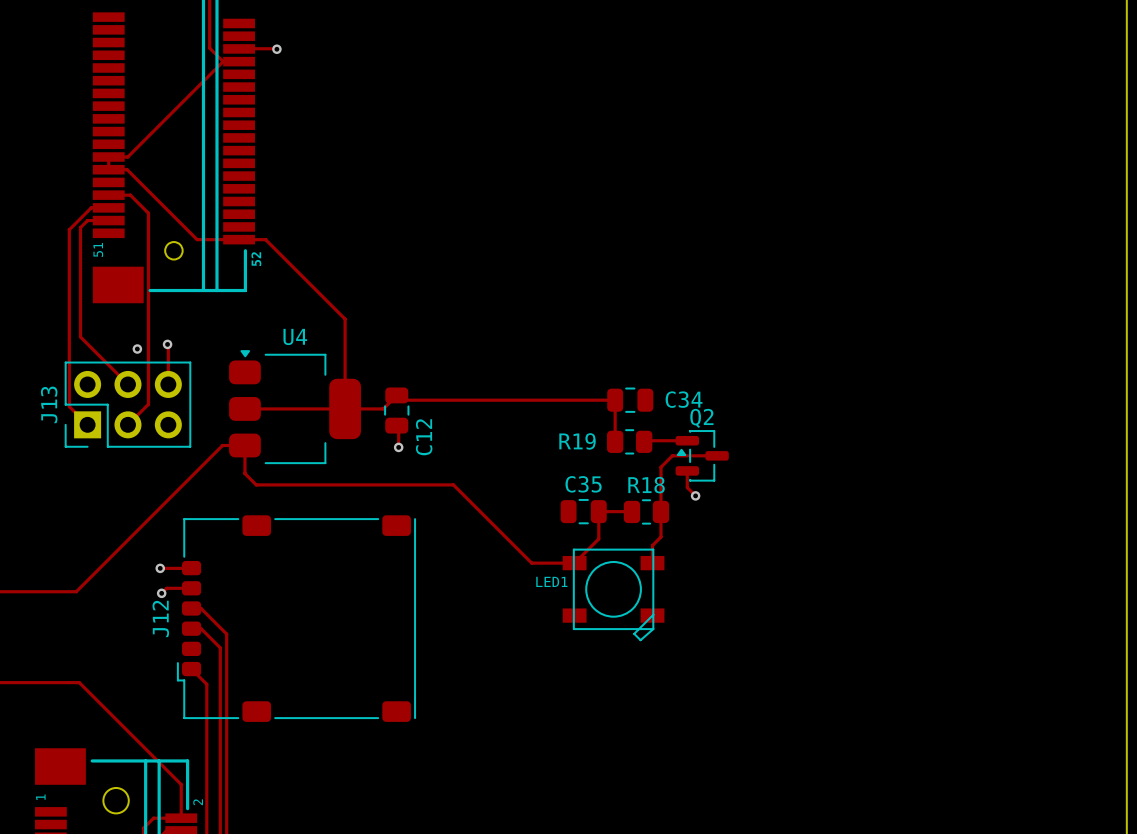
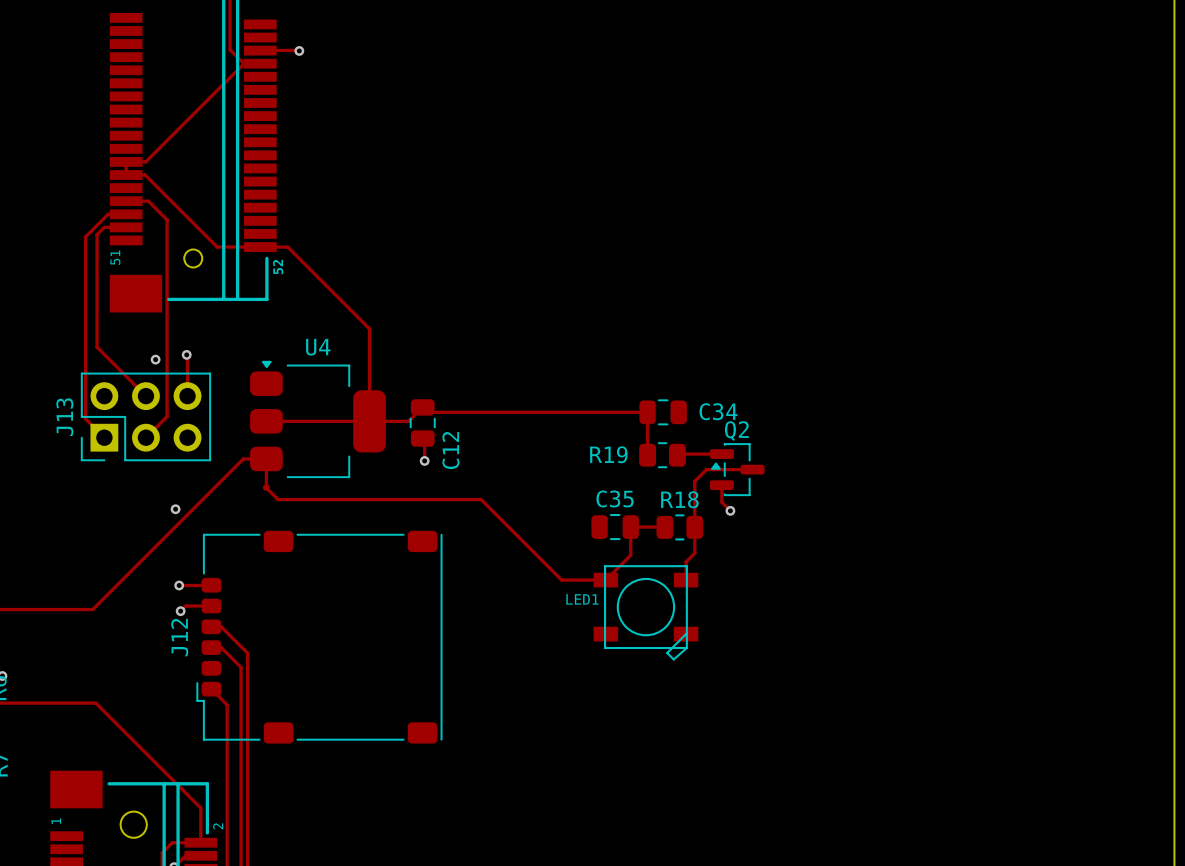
via: none -> (175, 509)

